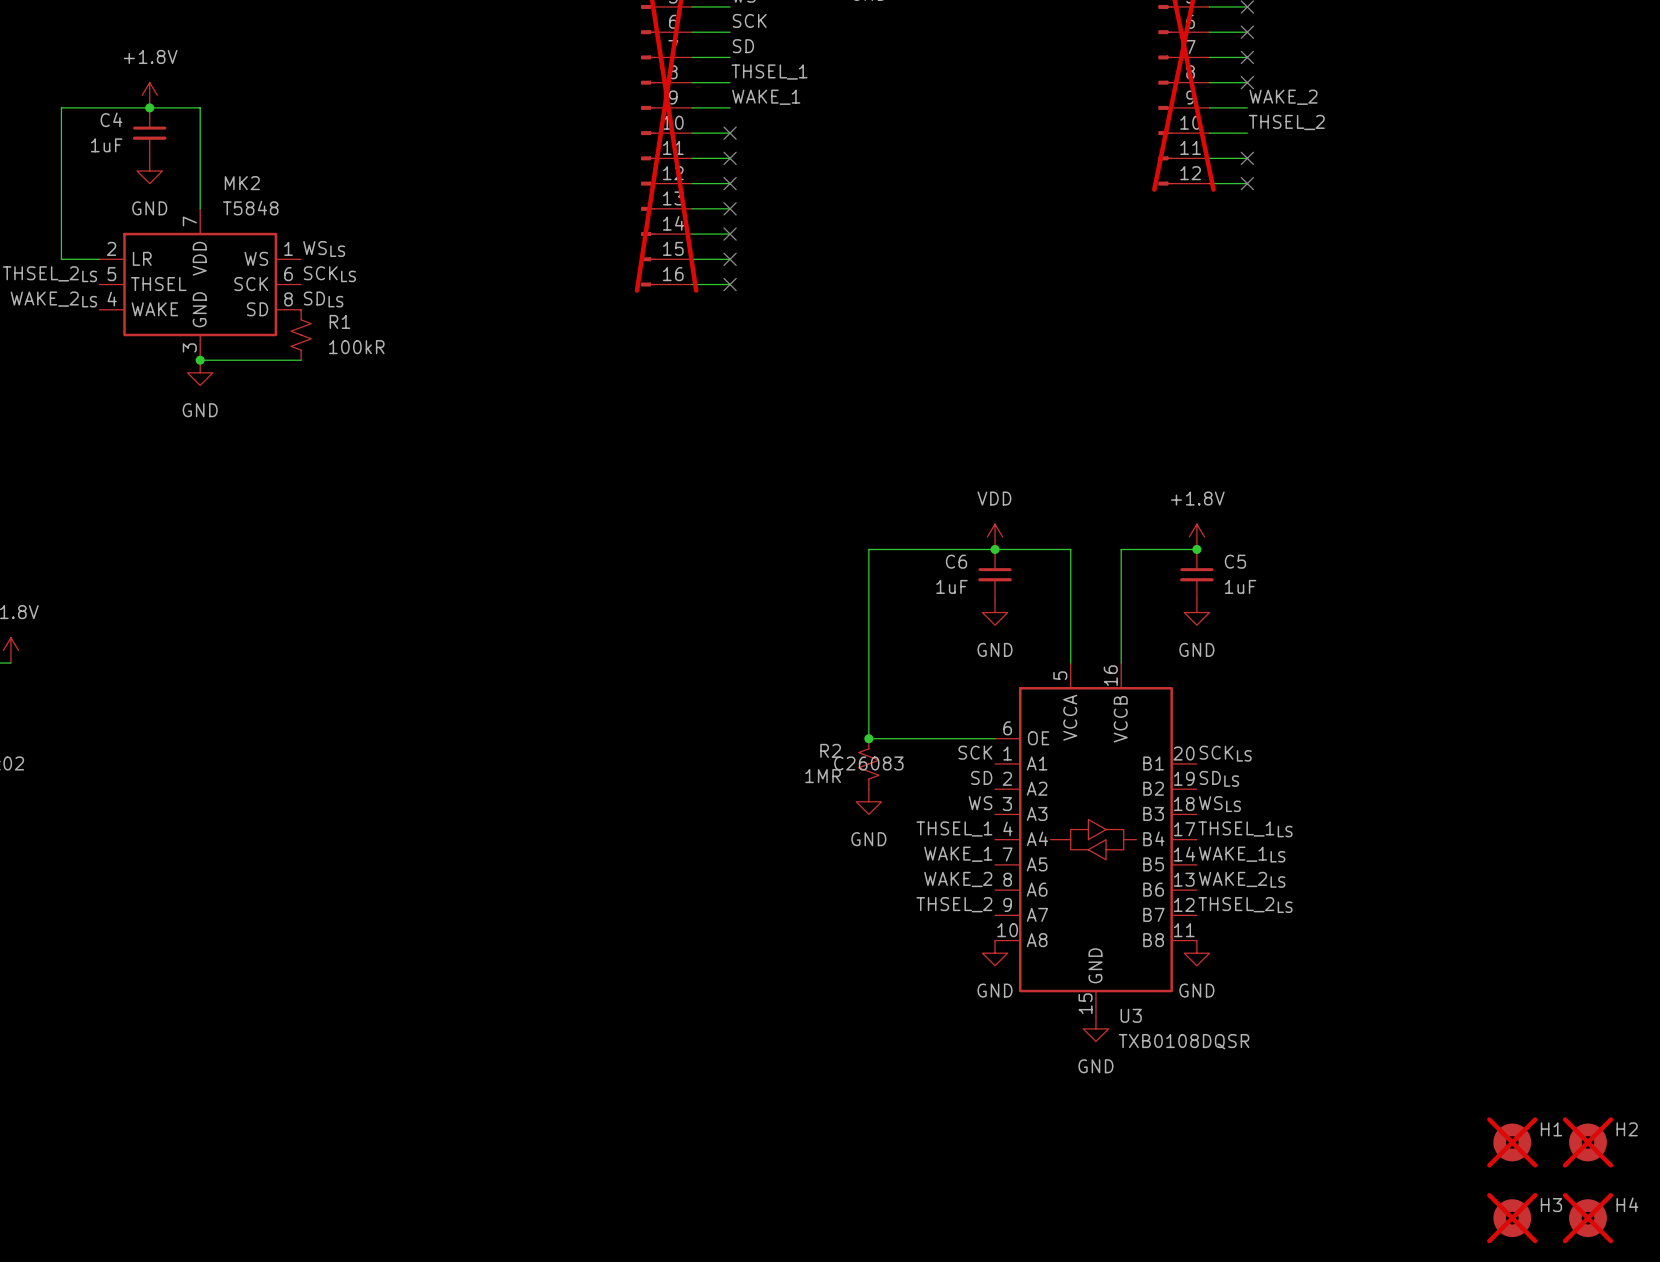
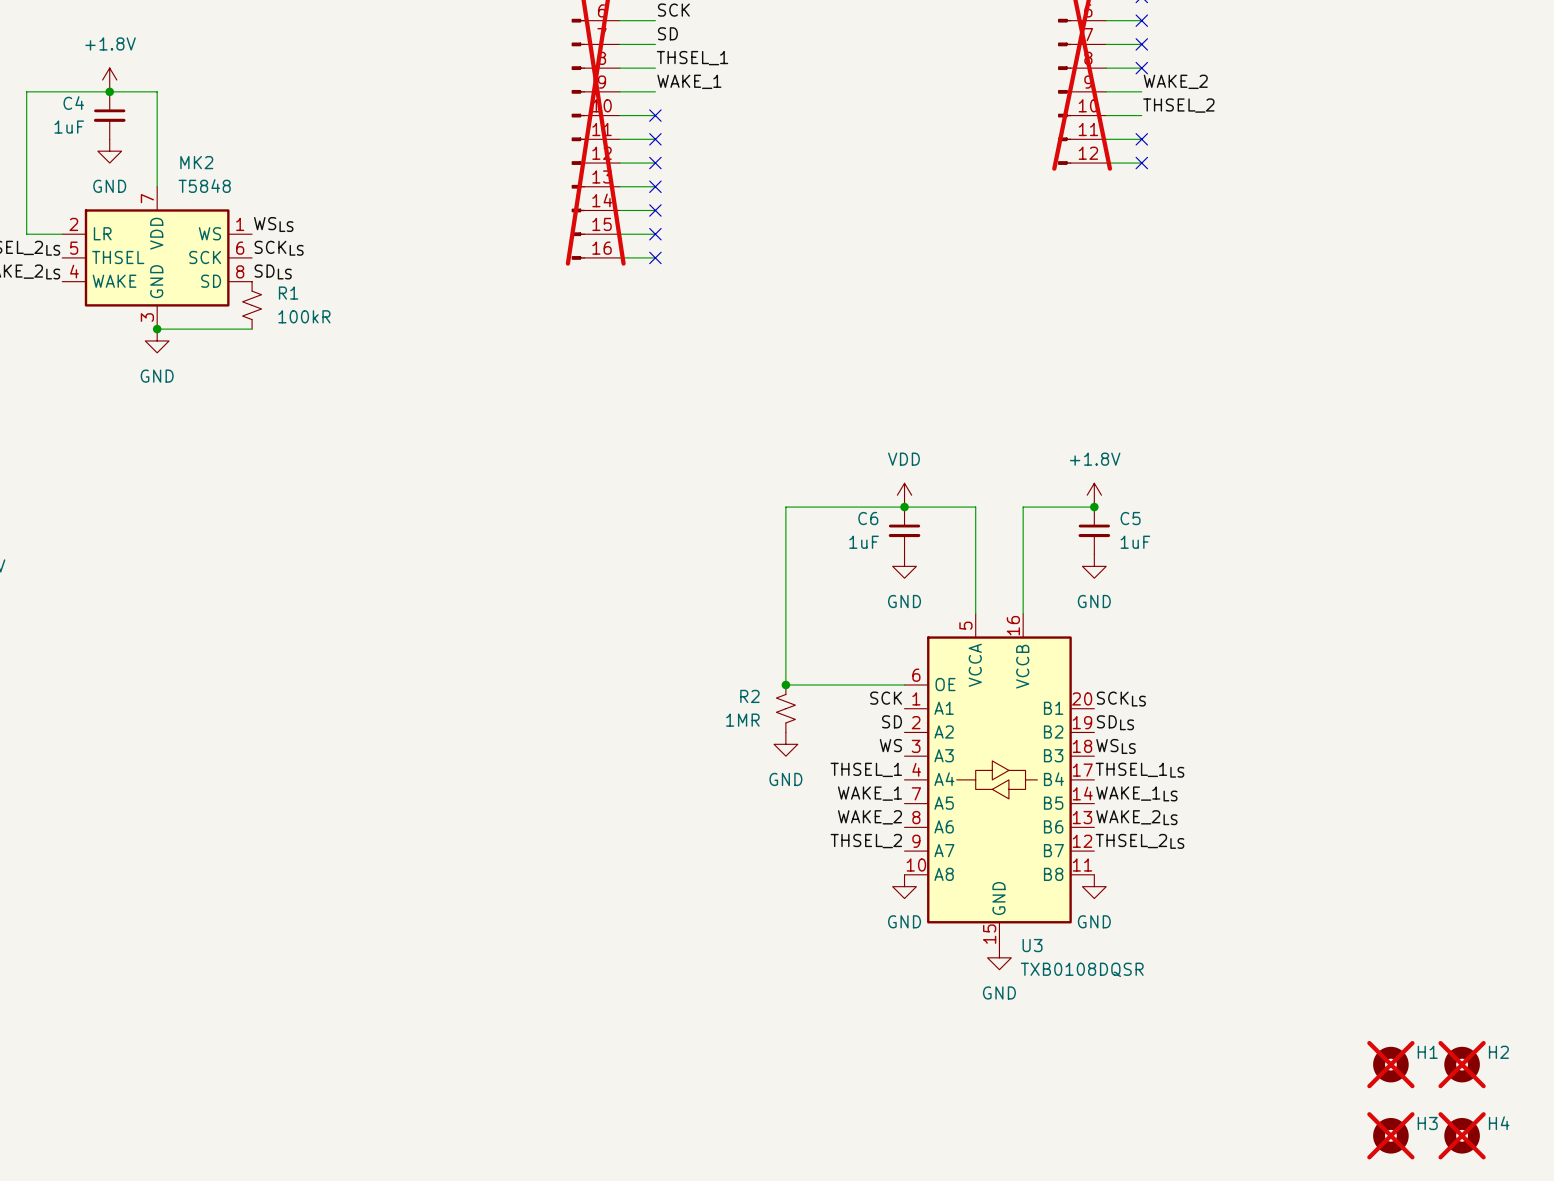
R2 text: C26083 (868, 763) -> none

